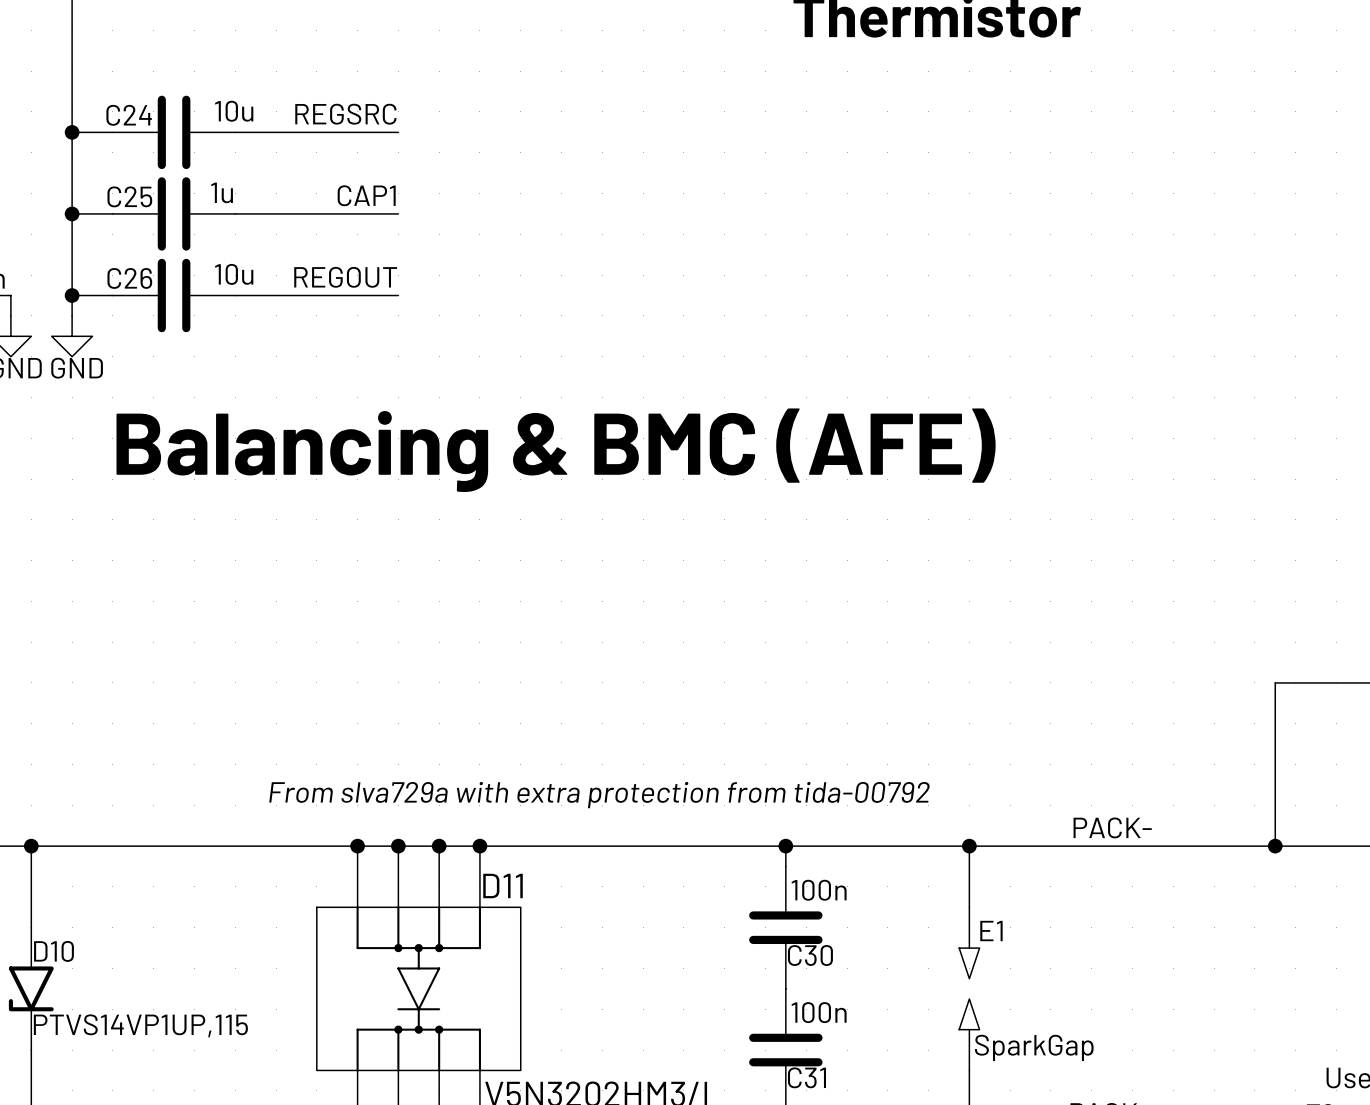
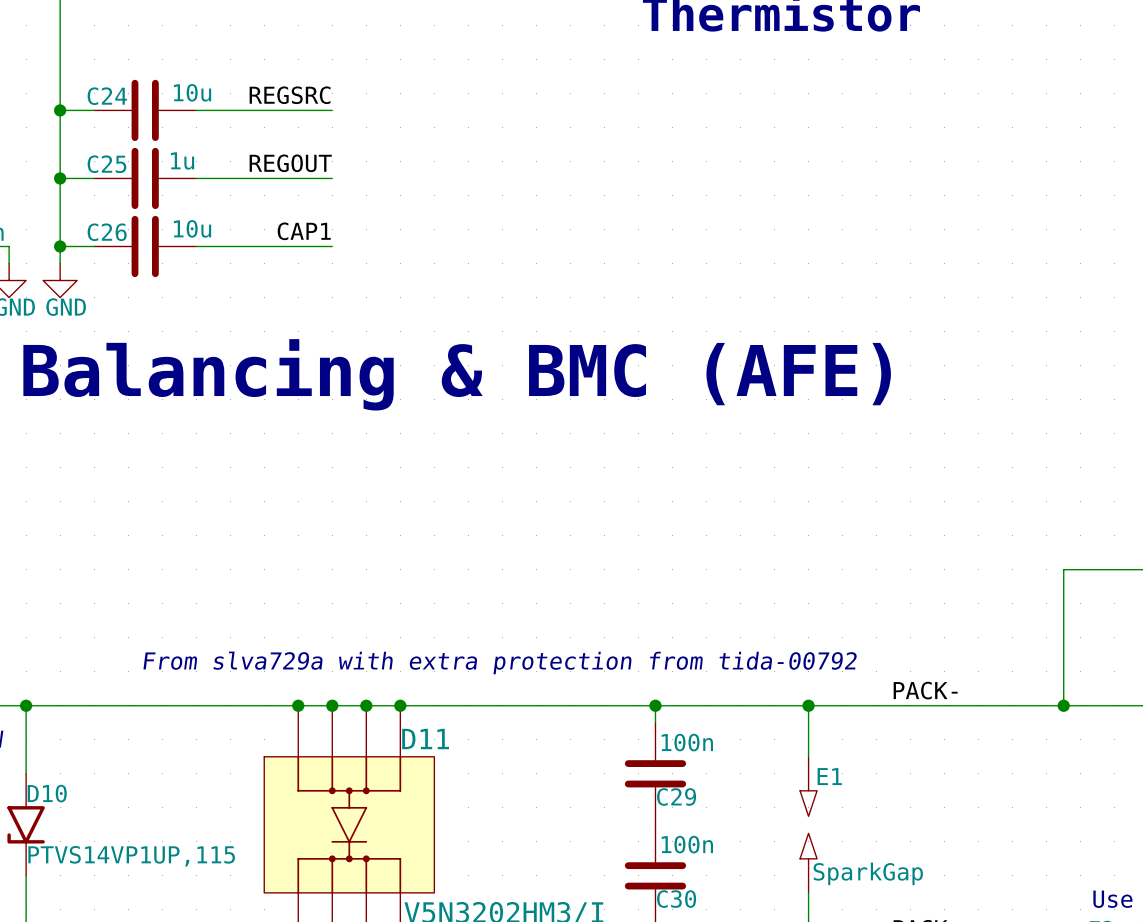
label: CAP1 (366, 195) -> REGOUT (290, 163)
label: REGOUT (345, 277) -> CAP1 (304, 231)
C30 name: C30 (810, 955) -> C29 (676, 796)
C31 name: C31 (806, 1077) -> C30 (676, 899)

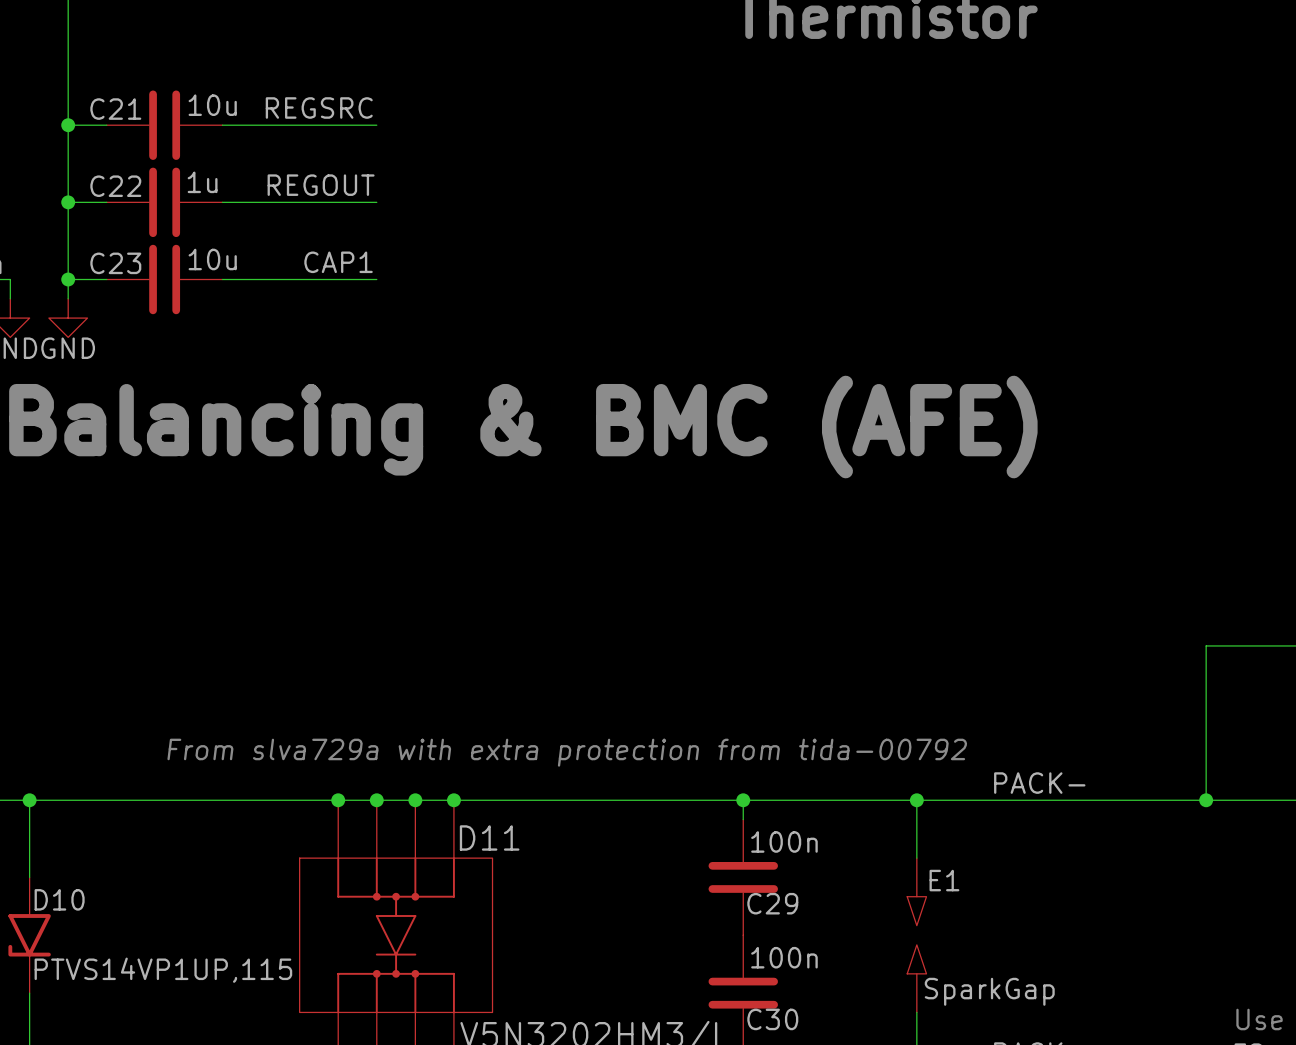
C24 name: C24 (107, 96) -> C21 (115, 109)
C25 name: C25 (106, 164) -> C22 (115, 186)
C26 name: C26 (107, 232) -> C23 (115, 263)

